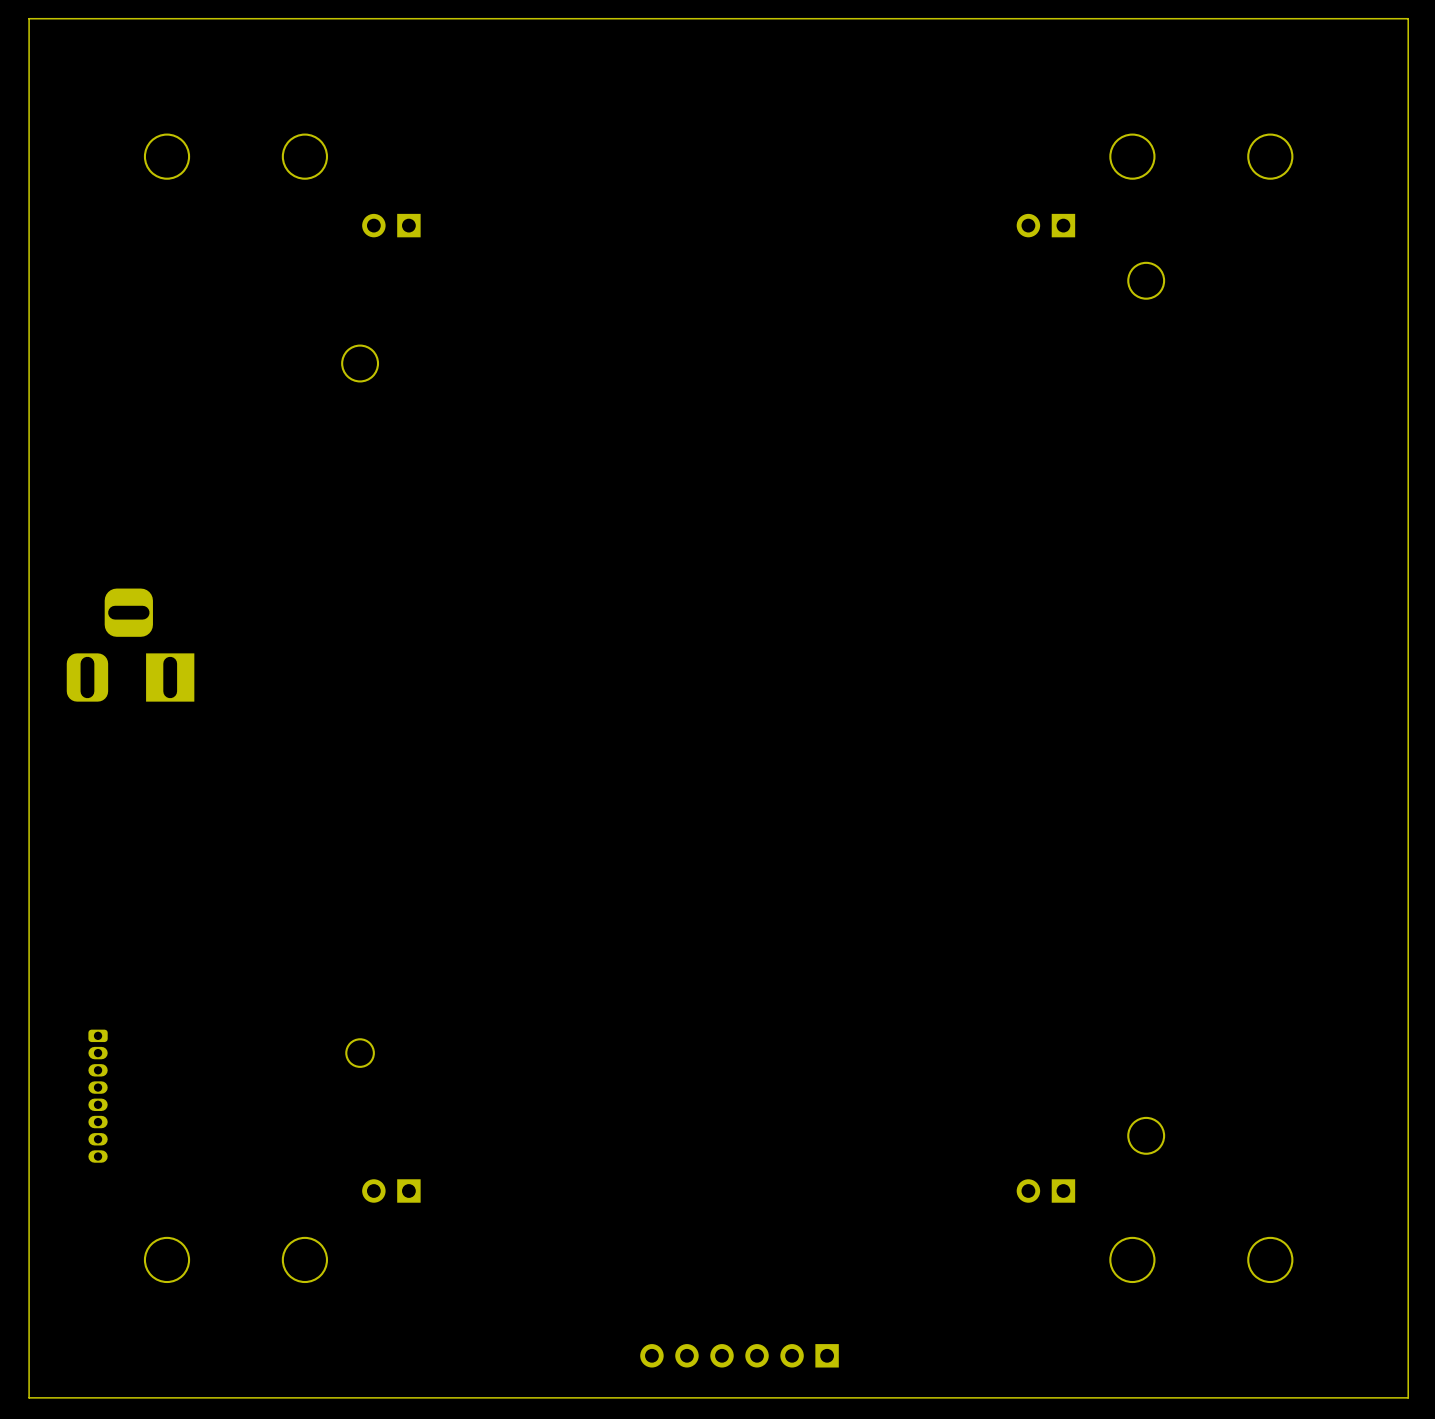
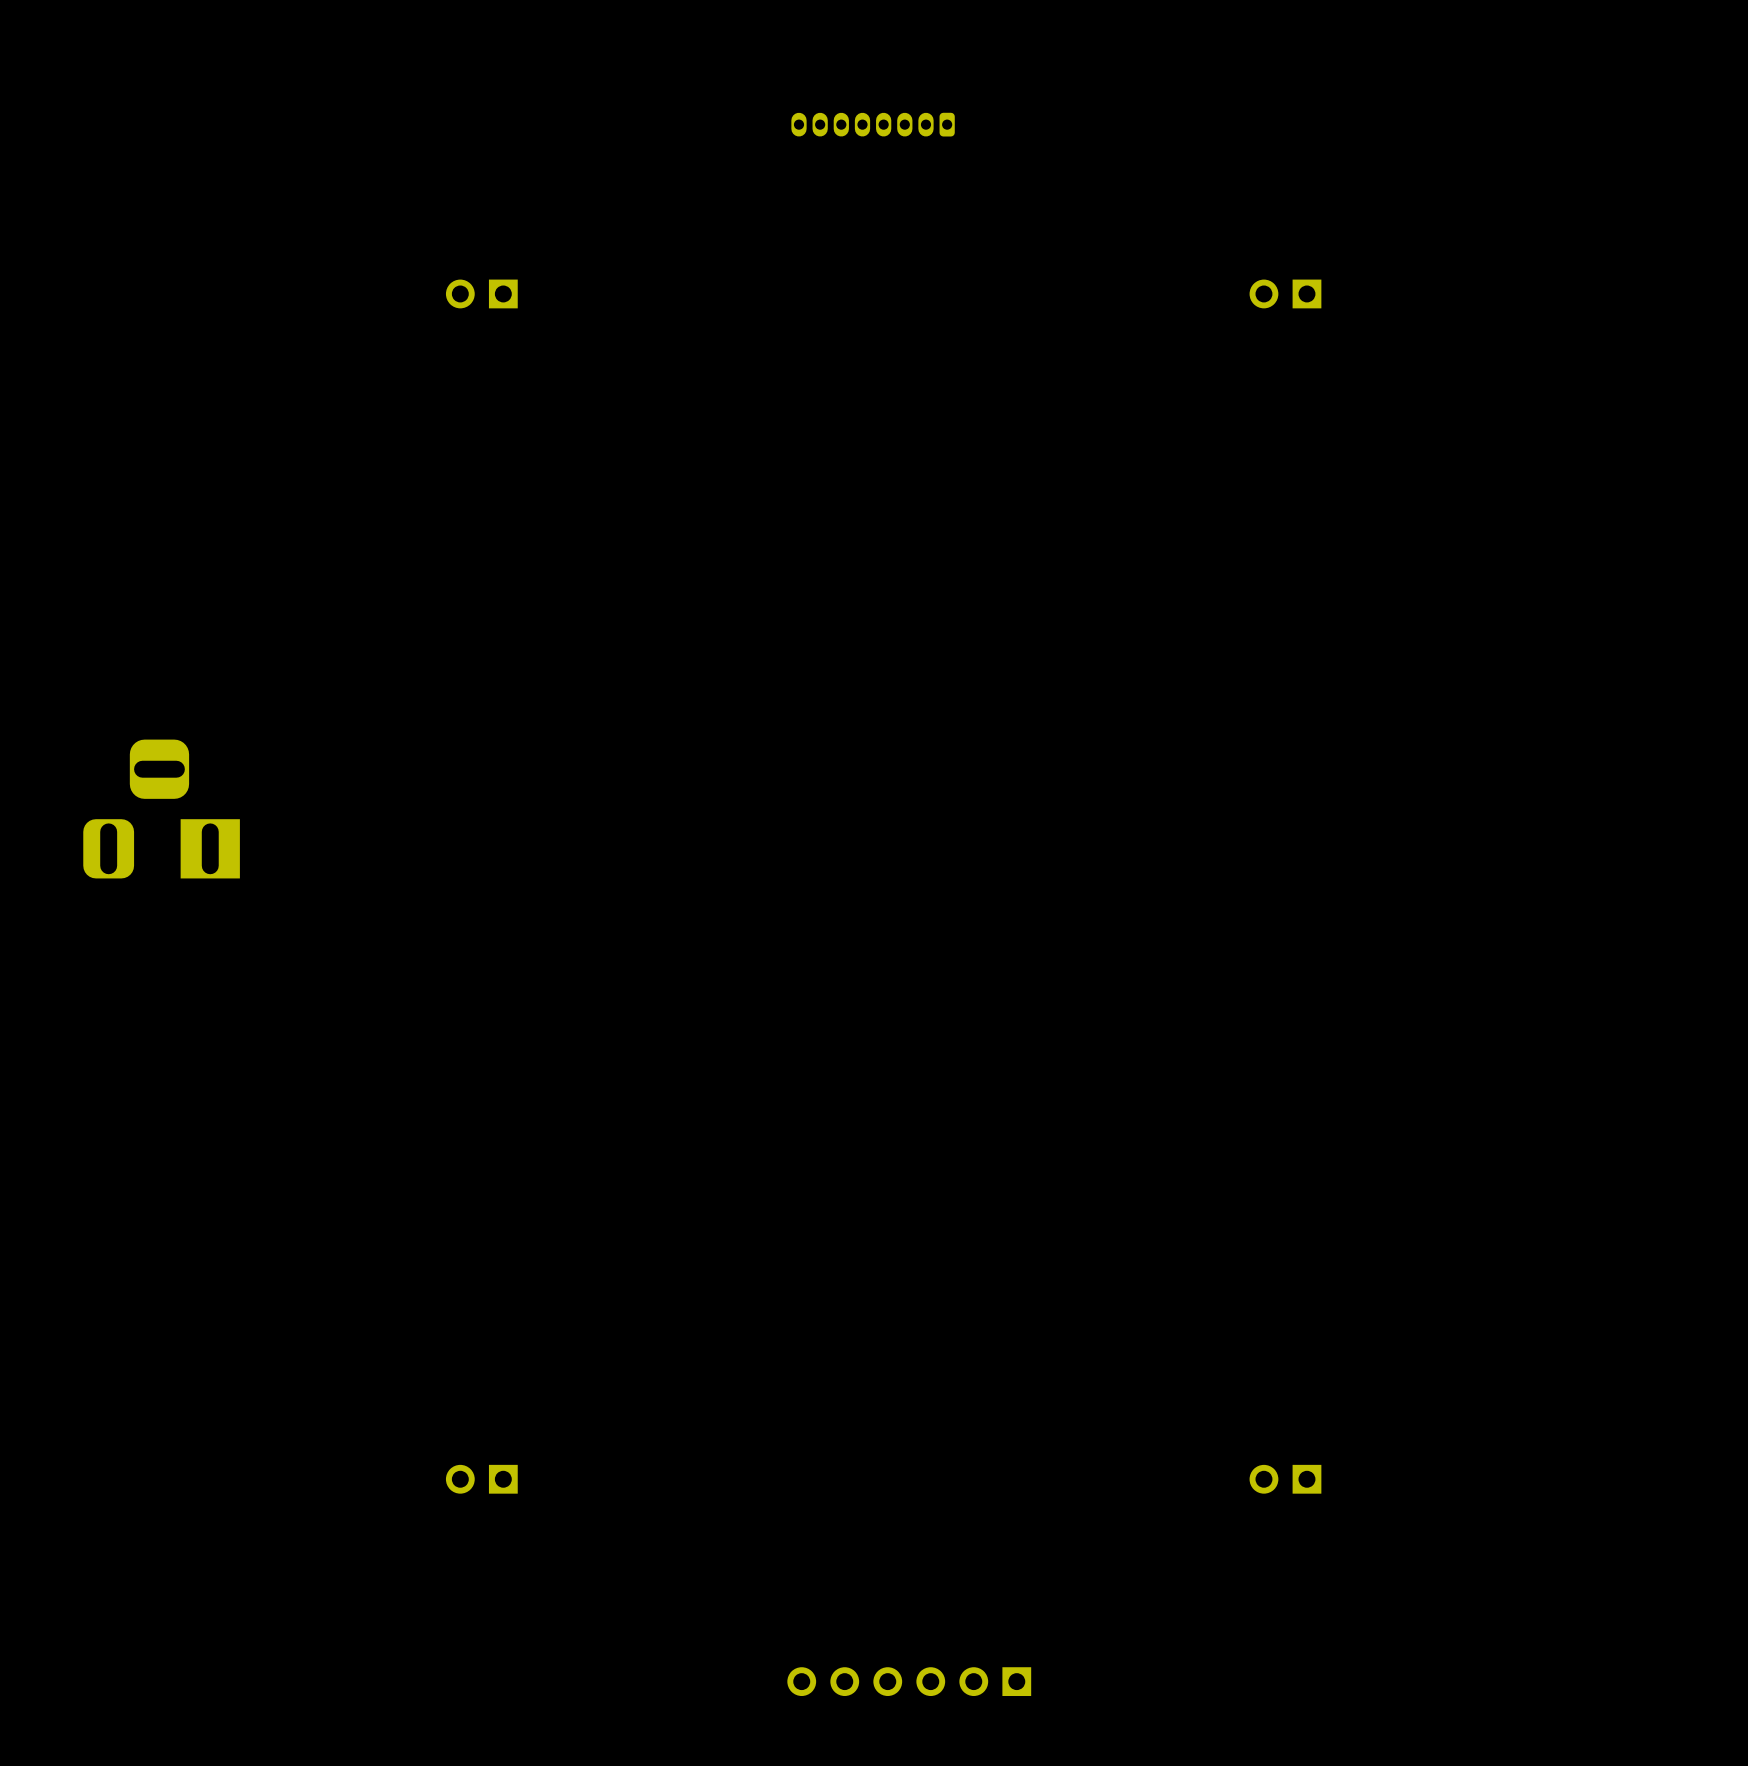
board edge: (1408, 18) (29, 18) (29, 1397) (1408, 1397) (1408, 18) -> none
part: none -> (873, 124)
round board edge: [143, 133, 191, 180] -> none
round board edge: [281, 133, 329, 180] -> none
round board edge: [1109, 133, 1156, 180] -> none
round board edge: [1247, 133, 1294, 180] -> none
round board edge: [1127, 261, 1166, 300] -> none
round board edge: [341, 344, 380, 383] -> none
round board edge: [345, 1038, 375, 1068] -> none
part: (98, 1096) -> none
round board edge: [1127, 1116, 1166, 1155] -> none
round board edge: [143, 1236, 191, 1284] -> none
round board edge: [281, 1236, 329, 1284] -> none
round board edge: [1109, 1236, 1156, 1284] -> none
round board edge: [1247, 1236, 1294, 1284] -> none

